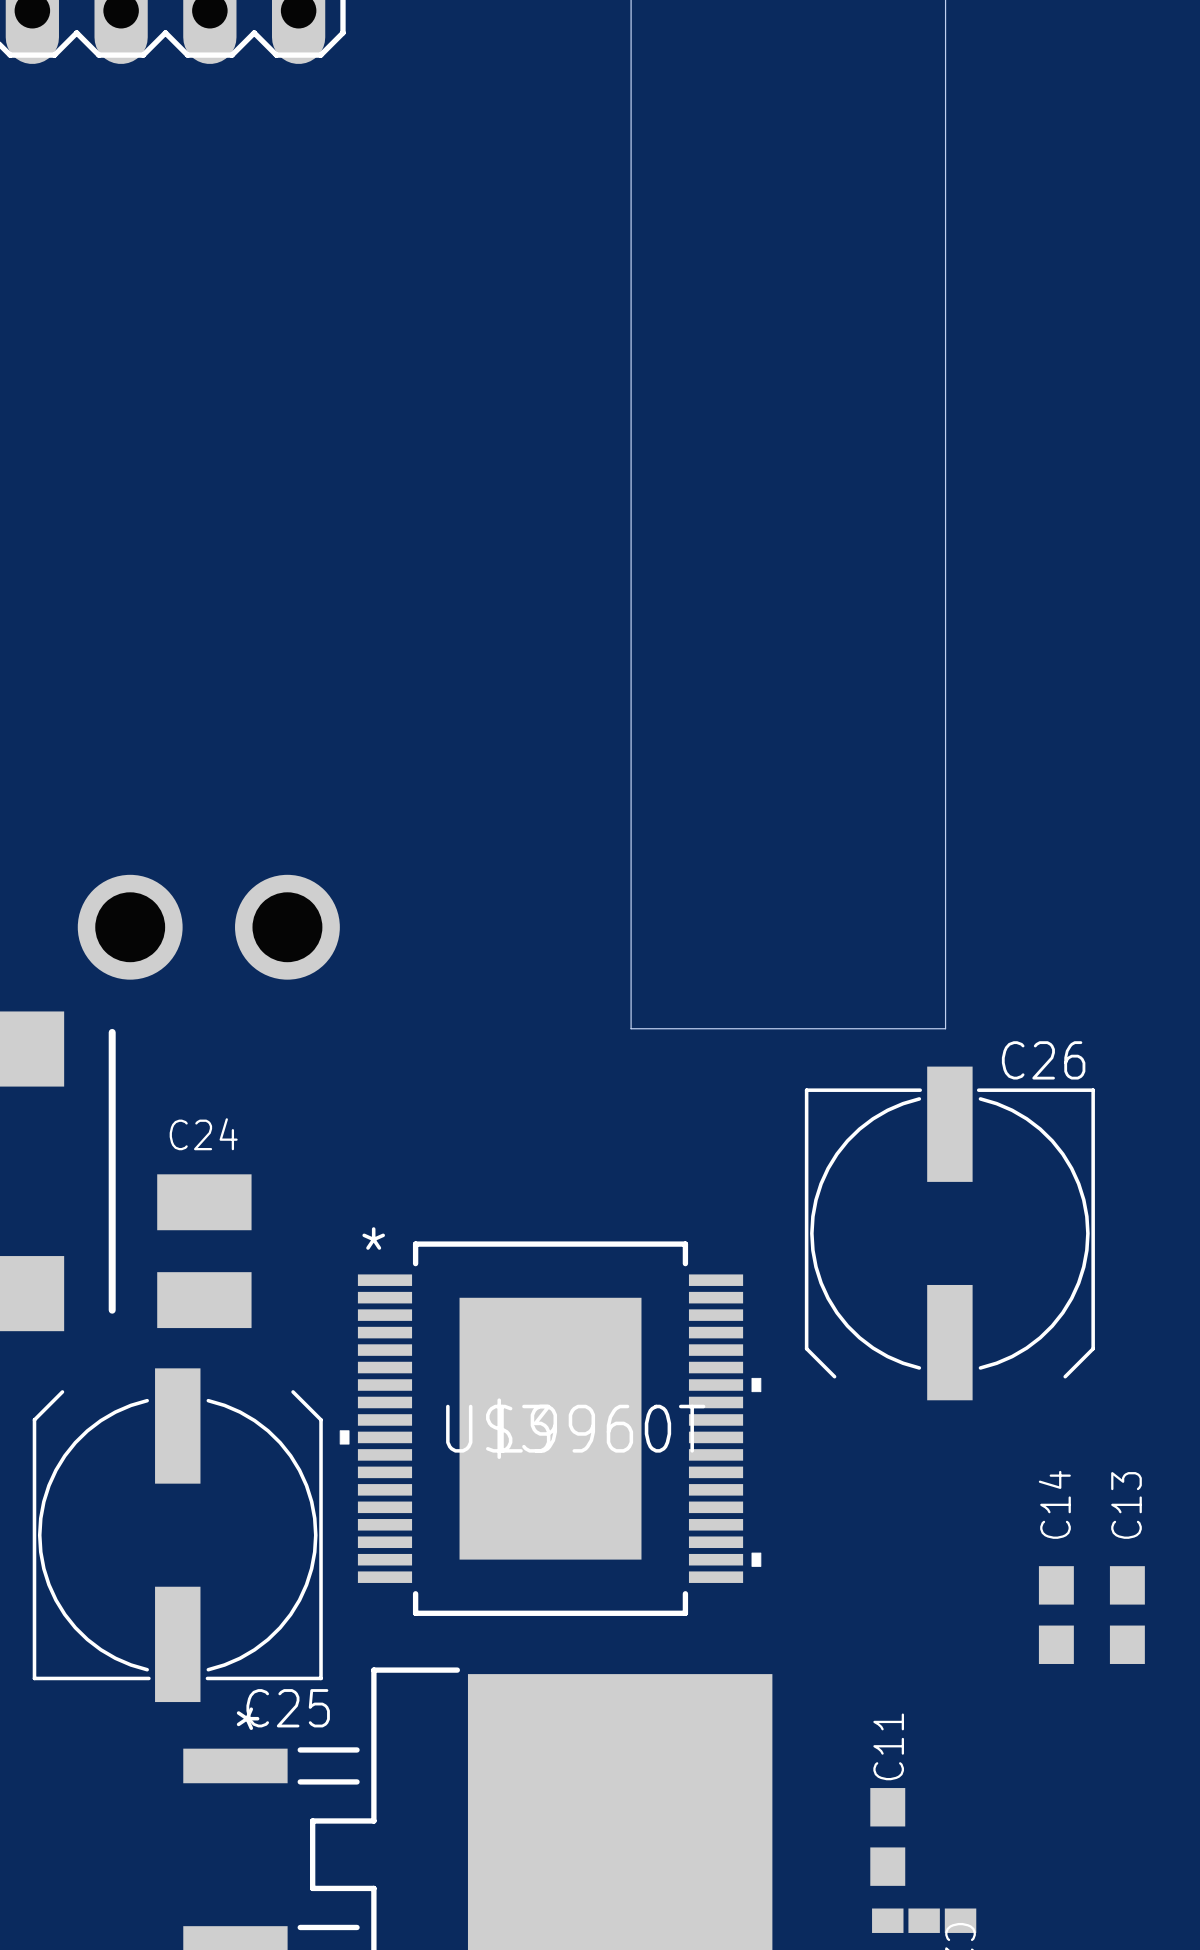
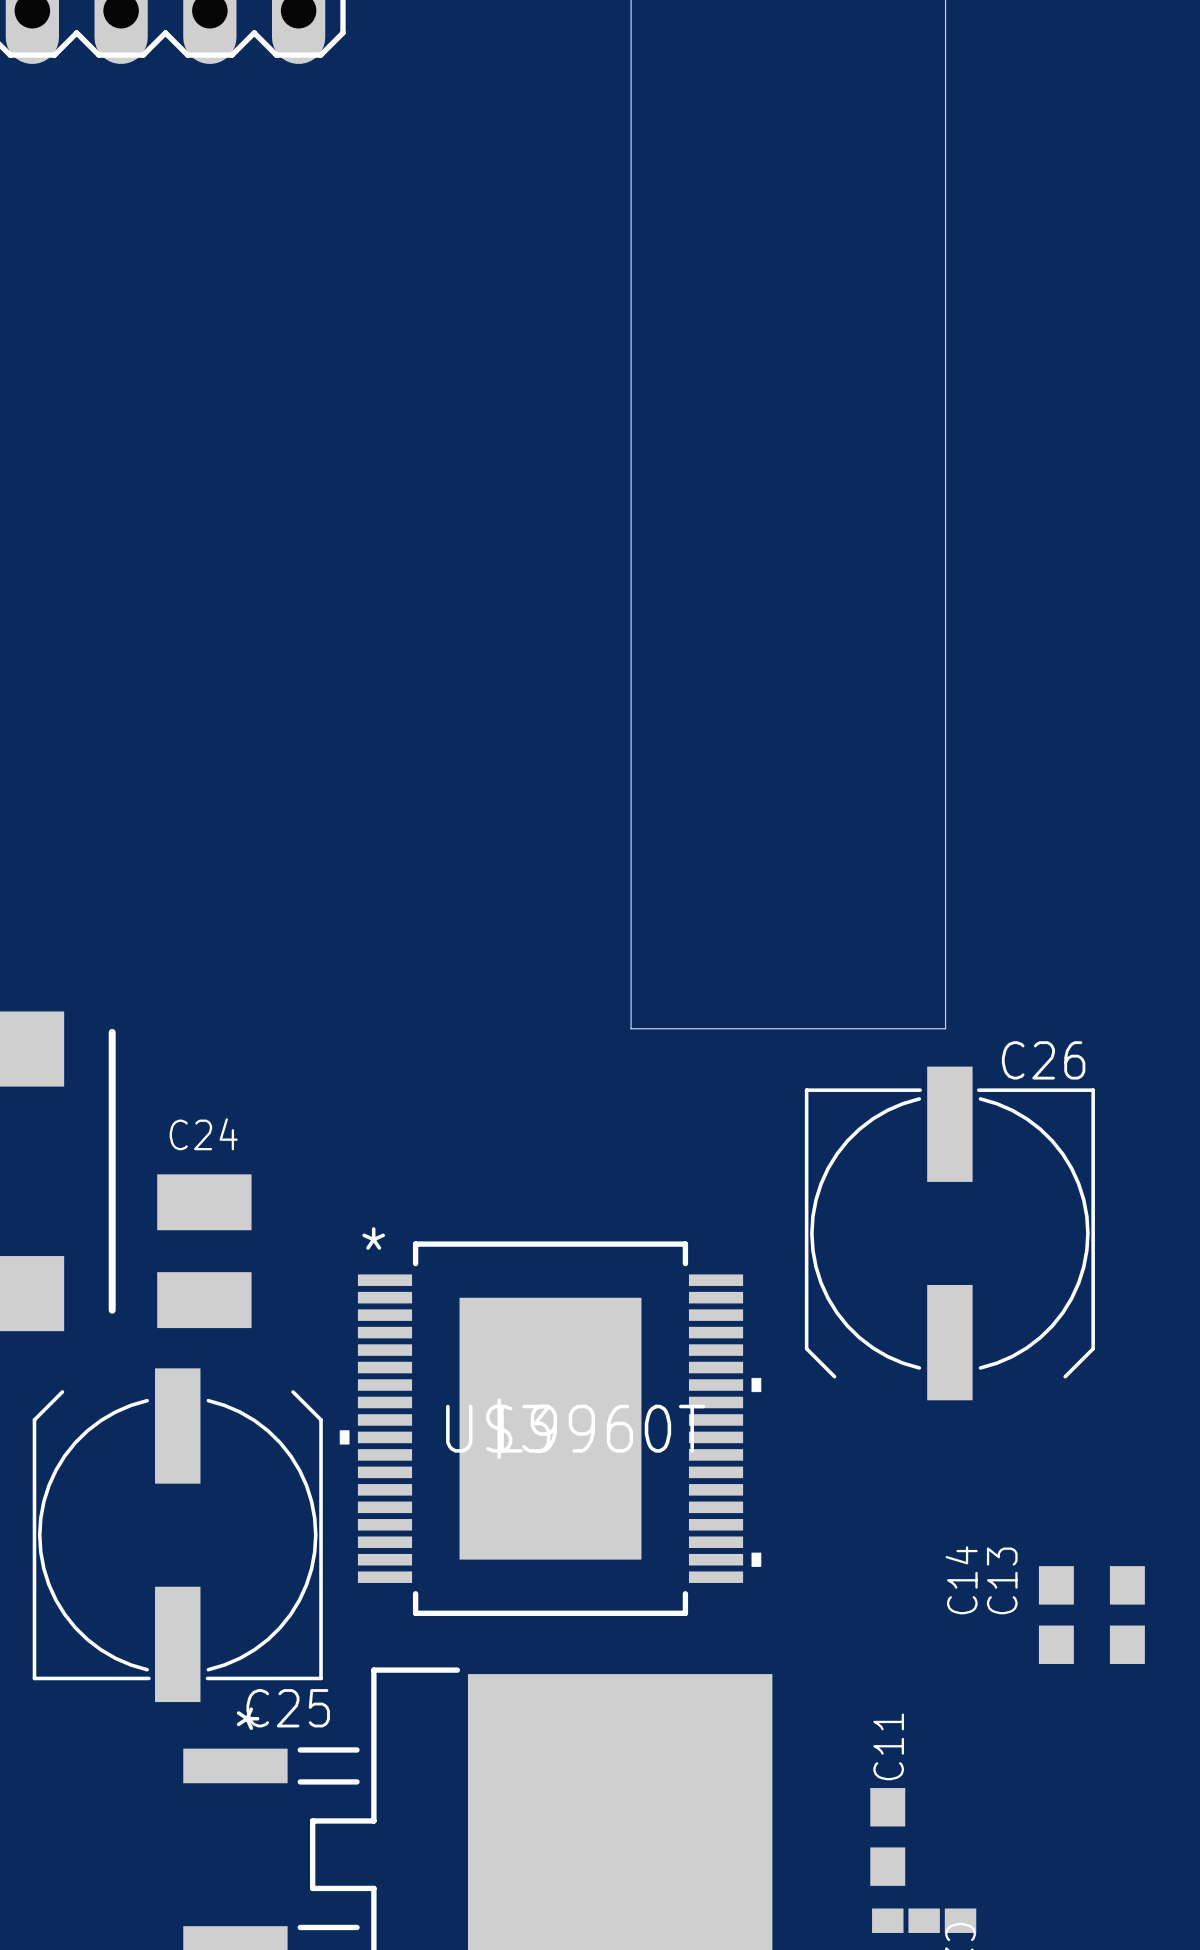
part: (208, 927) -> none
C14 name position: C14 (1054, 1504) -> C14 (961, 1580)
C13 name position: C13 (1126, 1505) -> C13 (1002, 1580)

